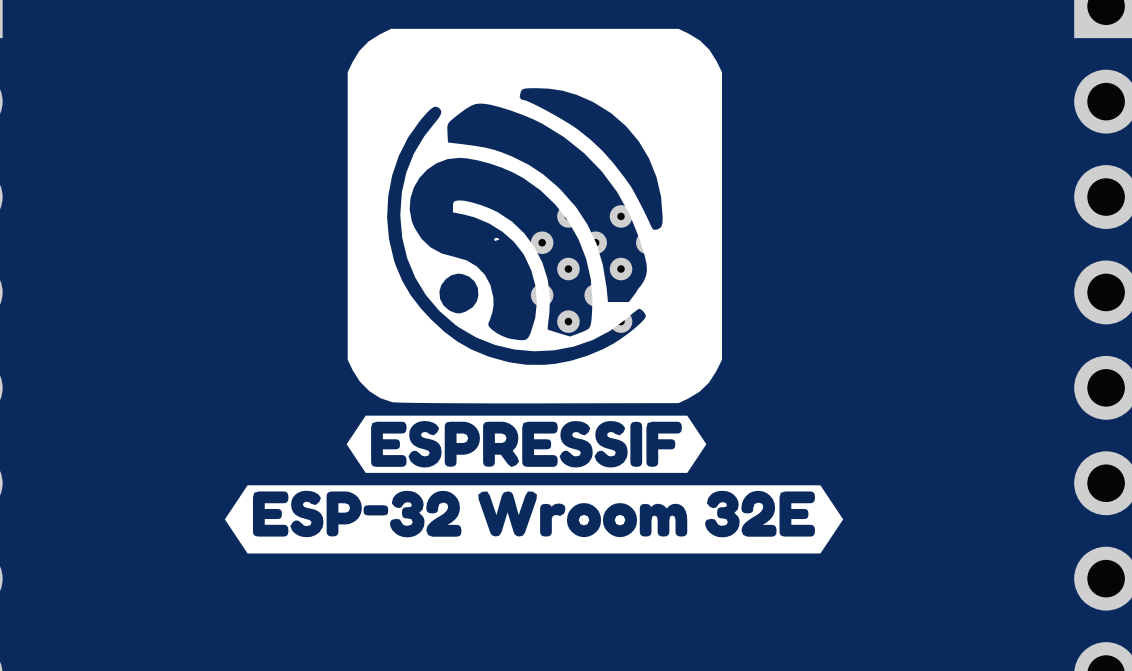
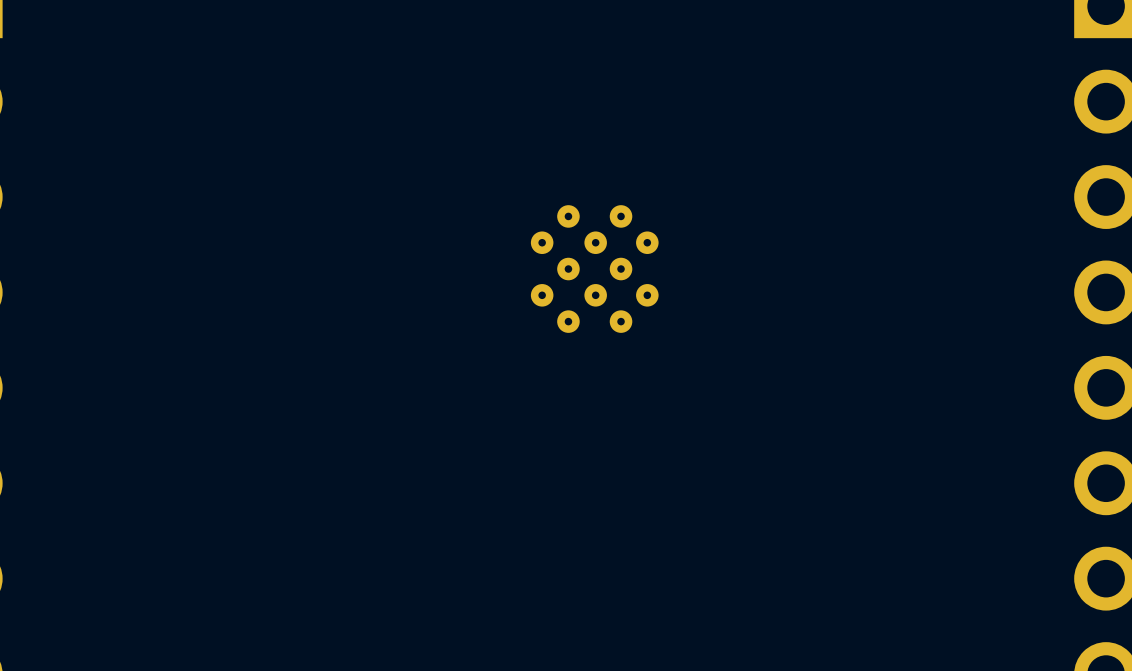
part: (534, 216) -> none
drawing: [224, 415, 844, 554] -> none

